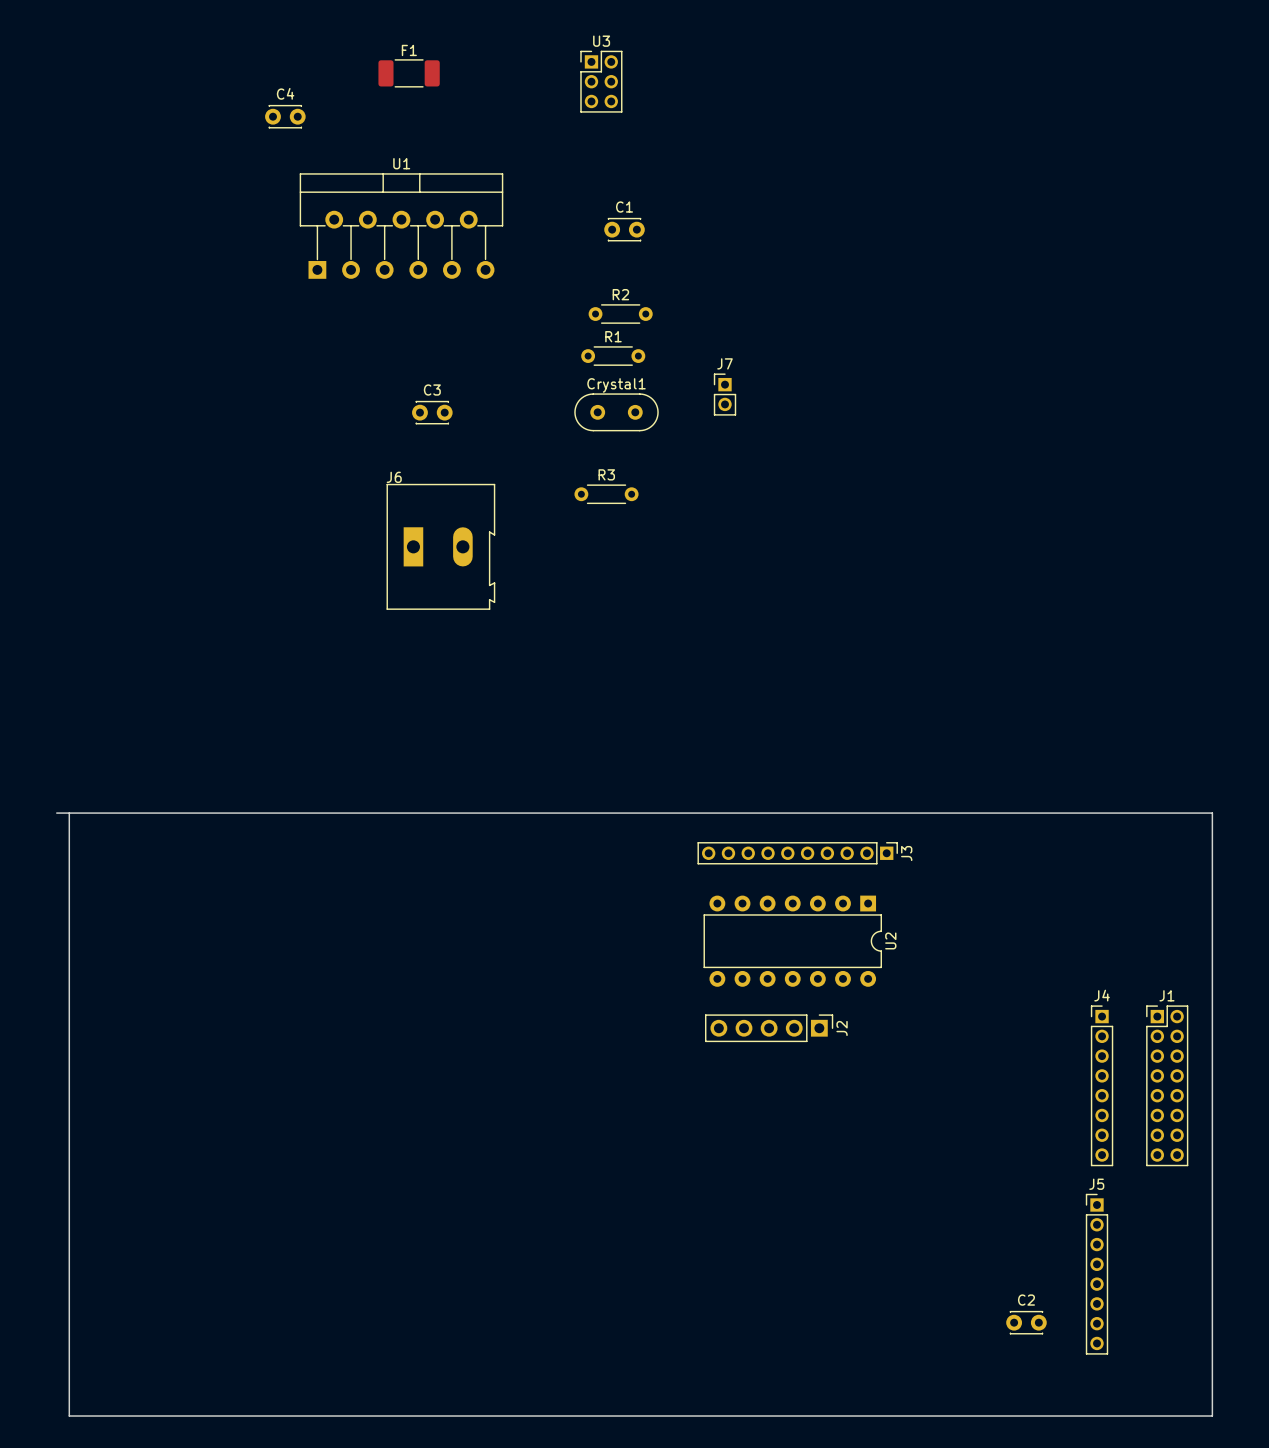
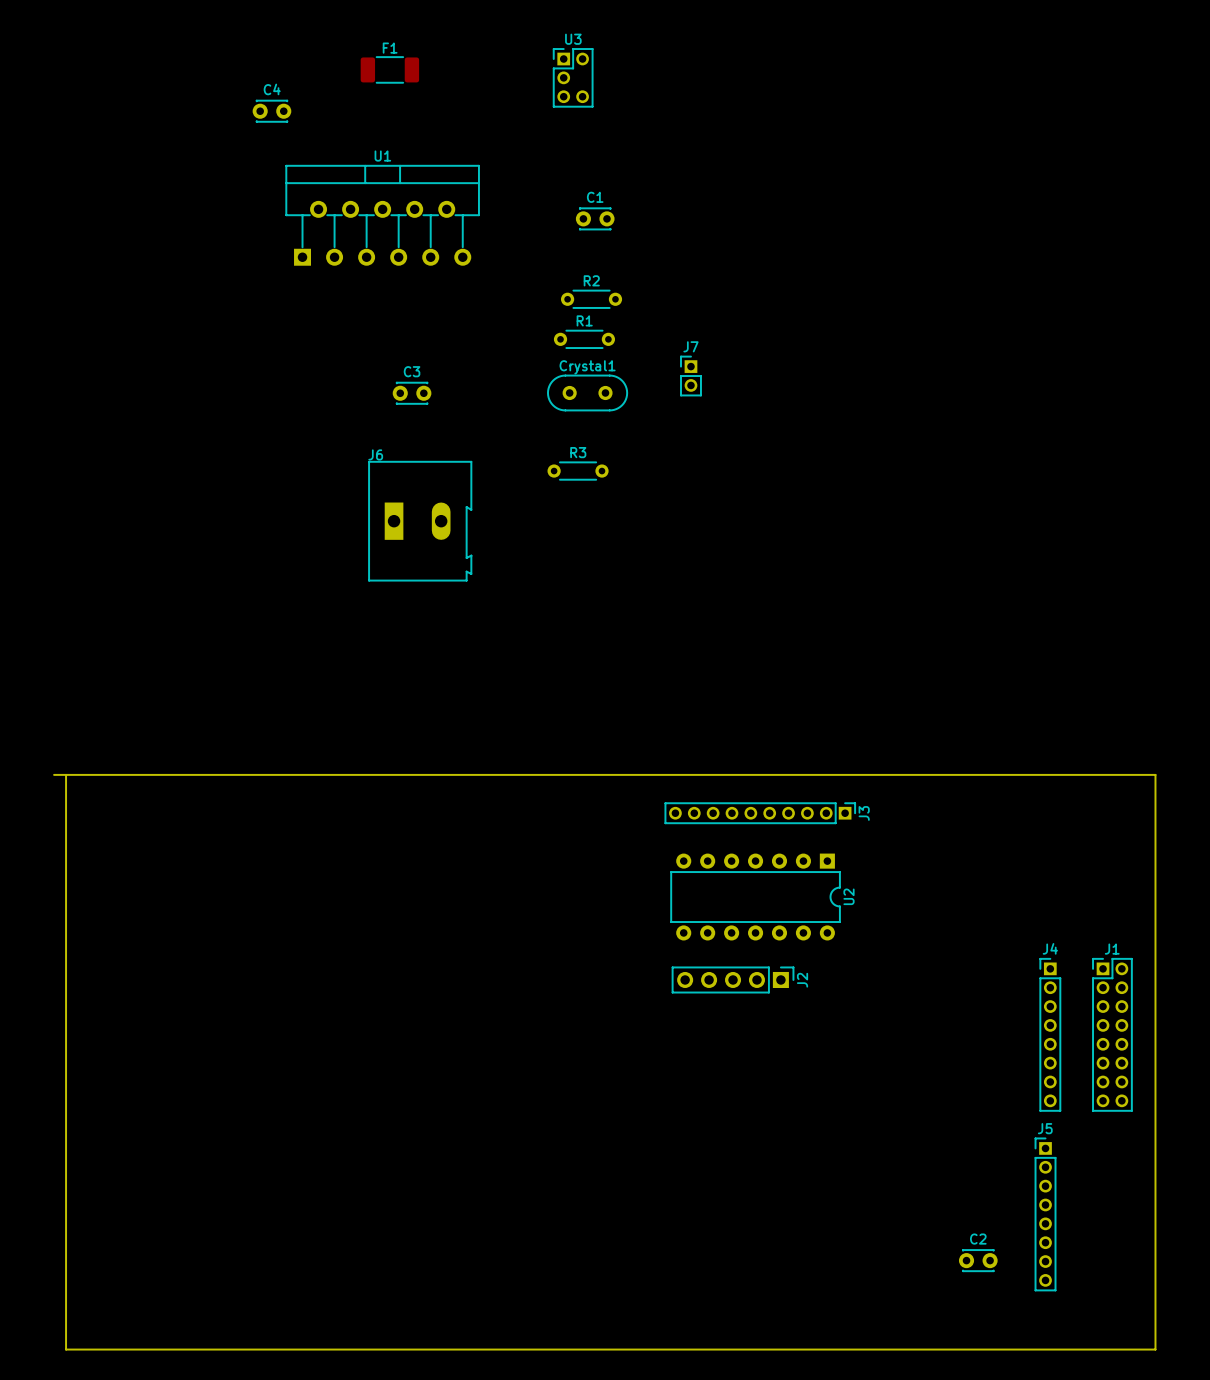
U3 footprint: [580, 50, 623, 113] -> [553, 48, 594, 108]

